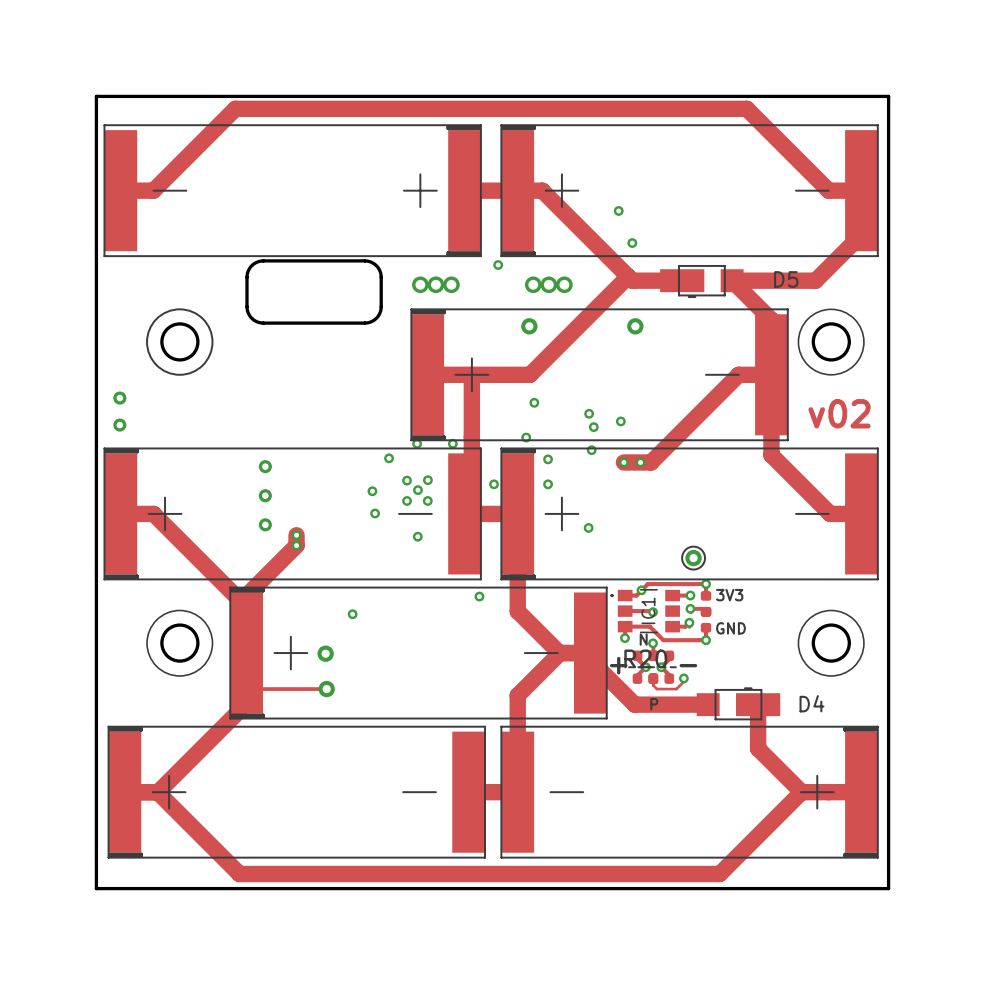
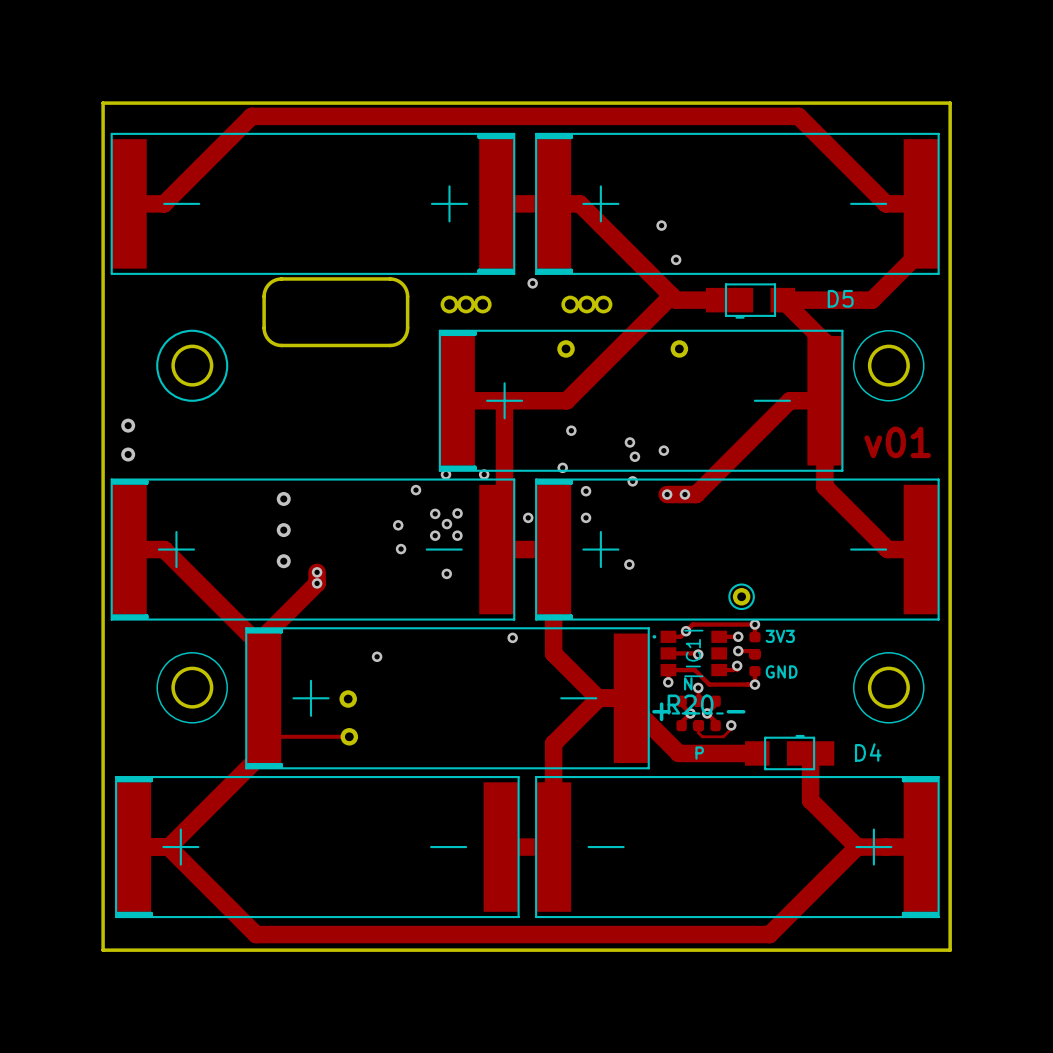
text: v02 (839, 413) -> v01 (897, 442)

